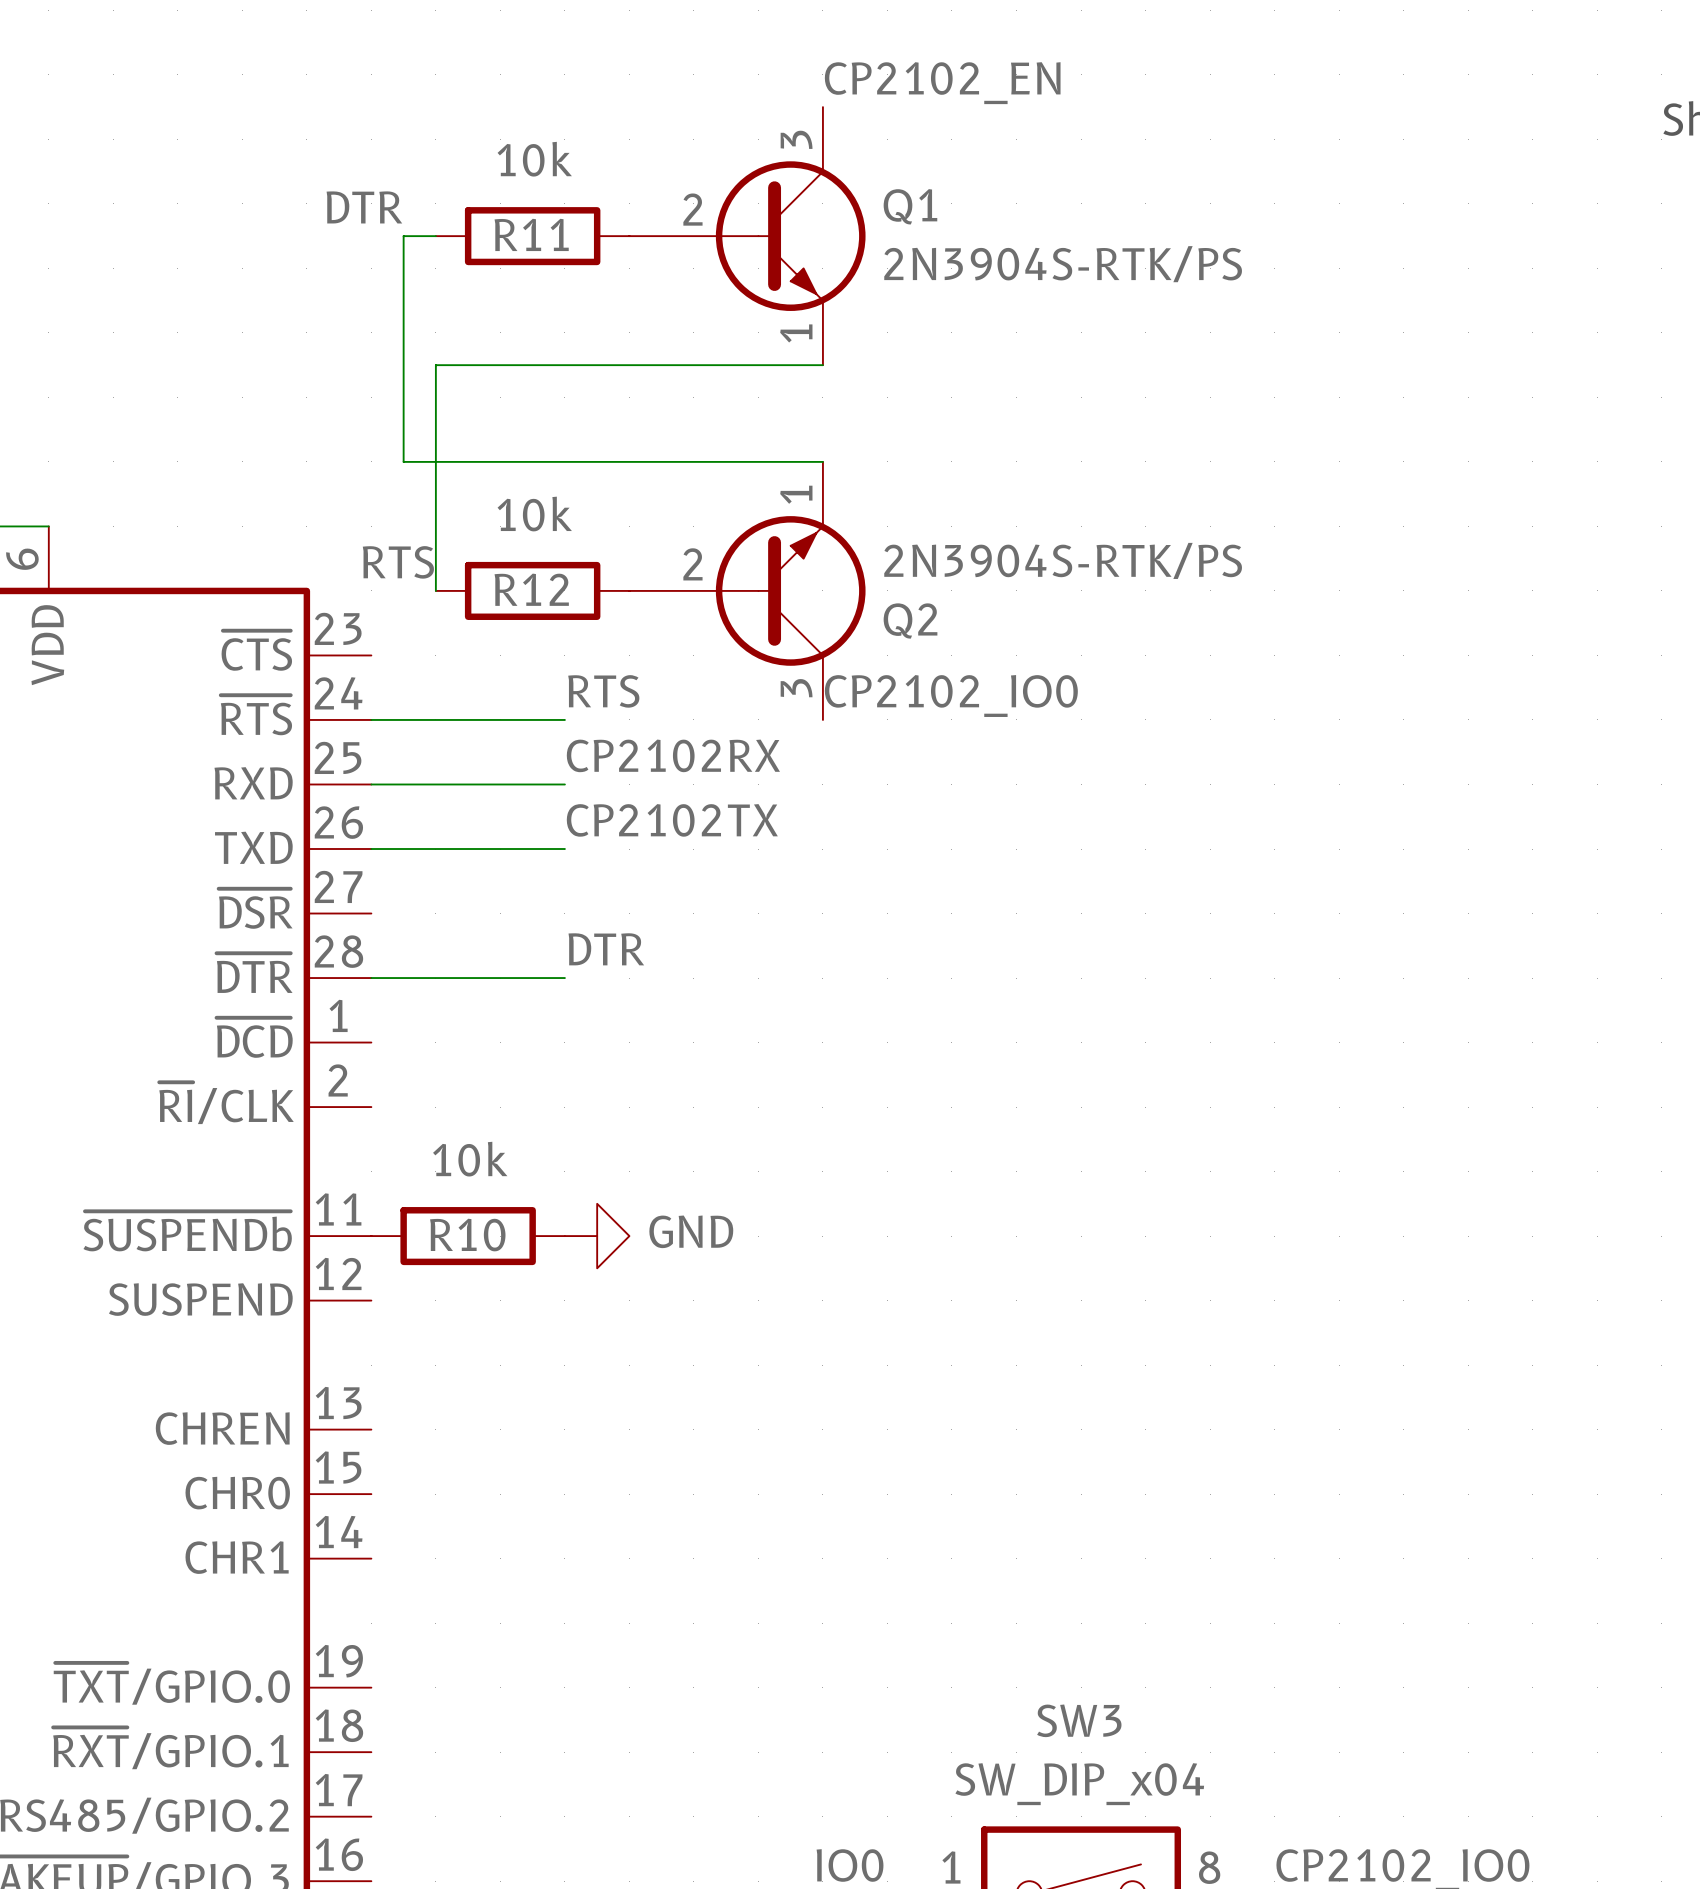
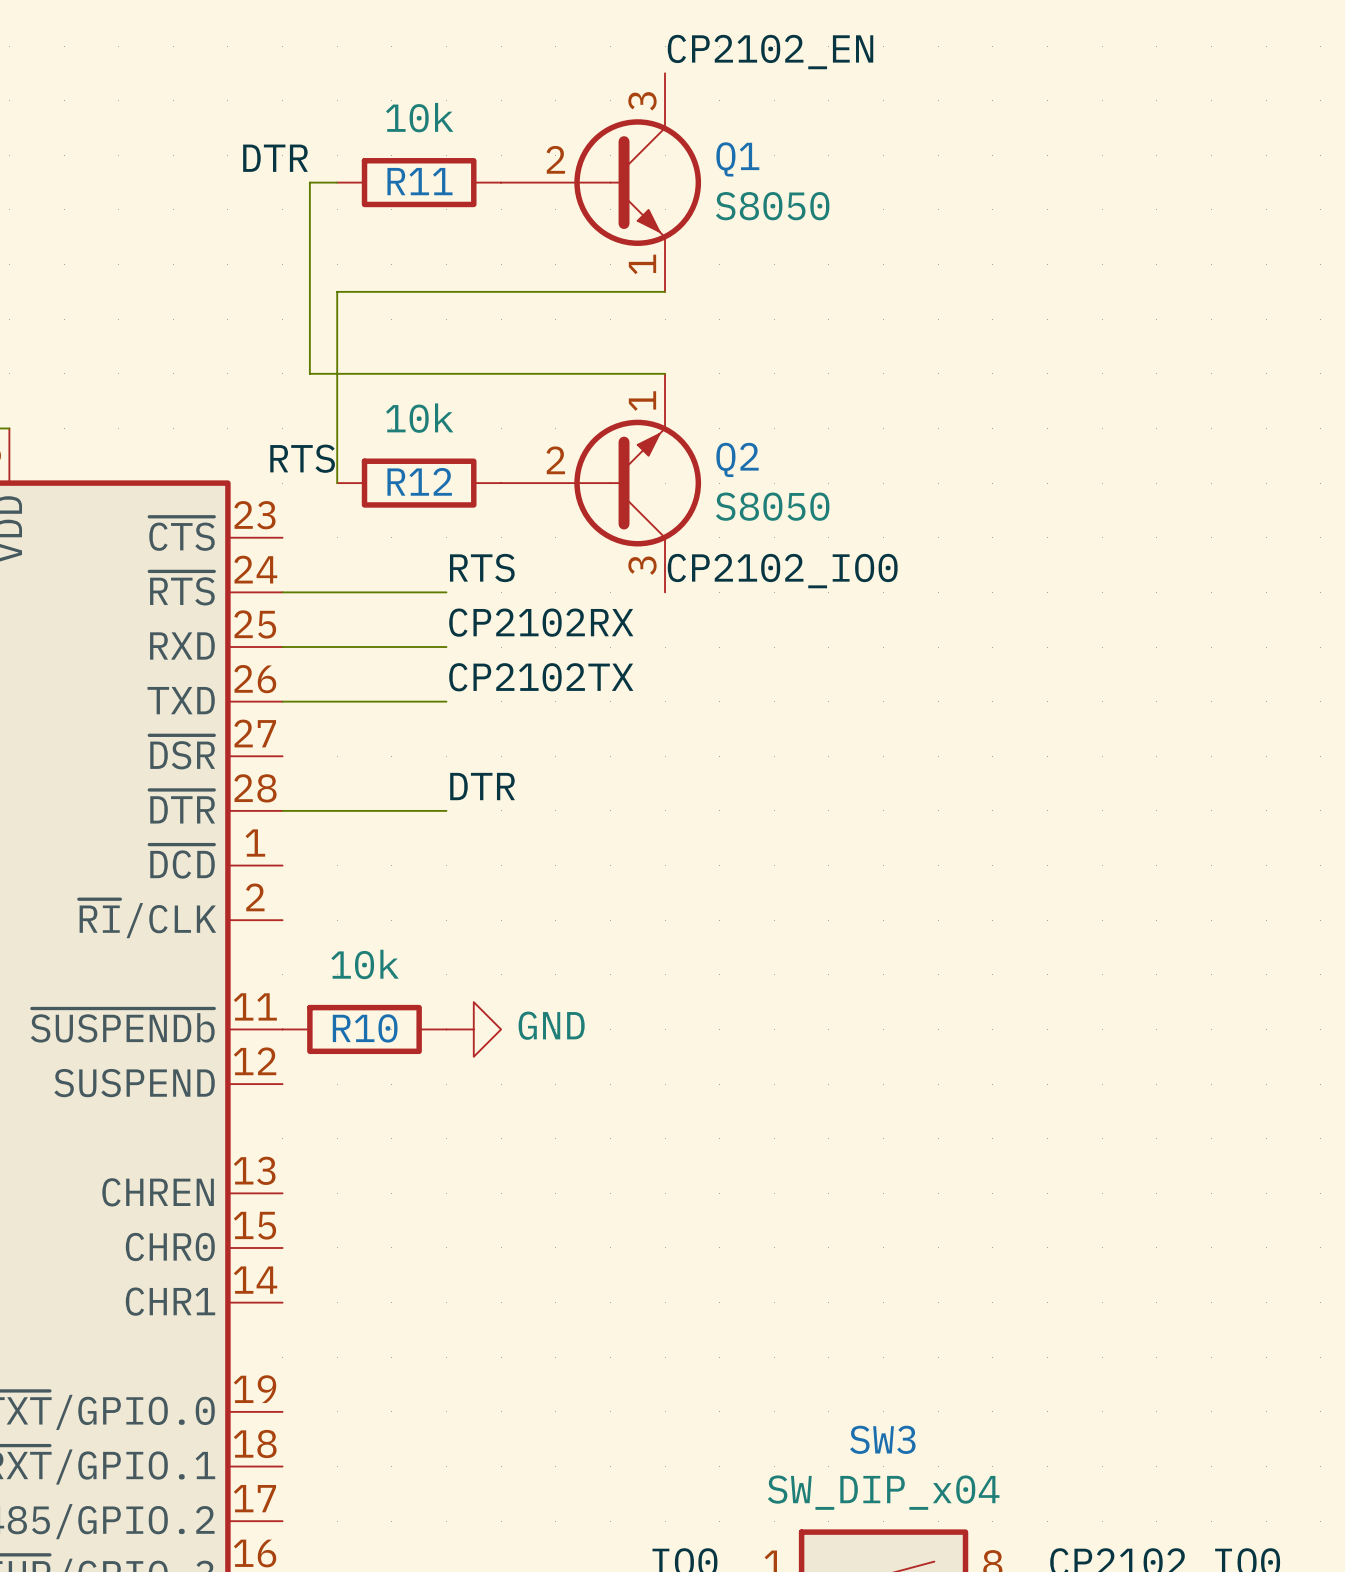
Q1 value: 2N3904S-RTK/PS (1063, 264) -> S8050 (772, 206)
Q2 value: 2N3904S-RTK/PS (1063, 560) -> S8050 (772, 506)
Q2 name position: Q2 (910, 620) -> Q2 (737, 459)

